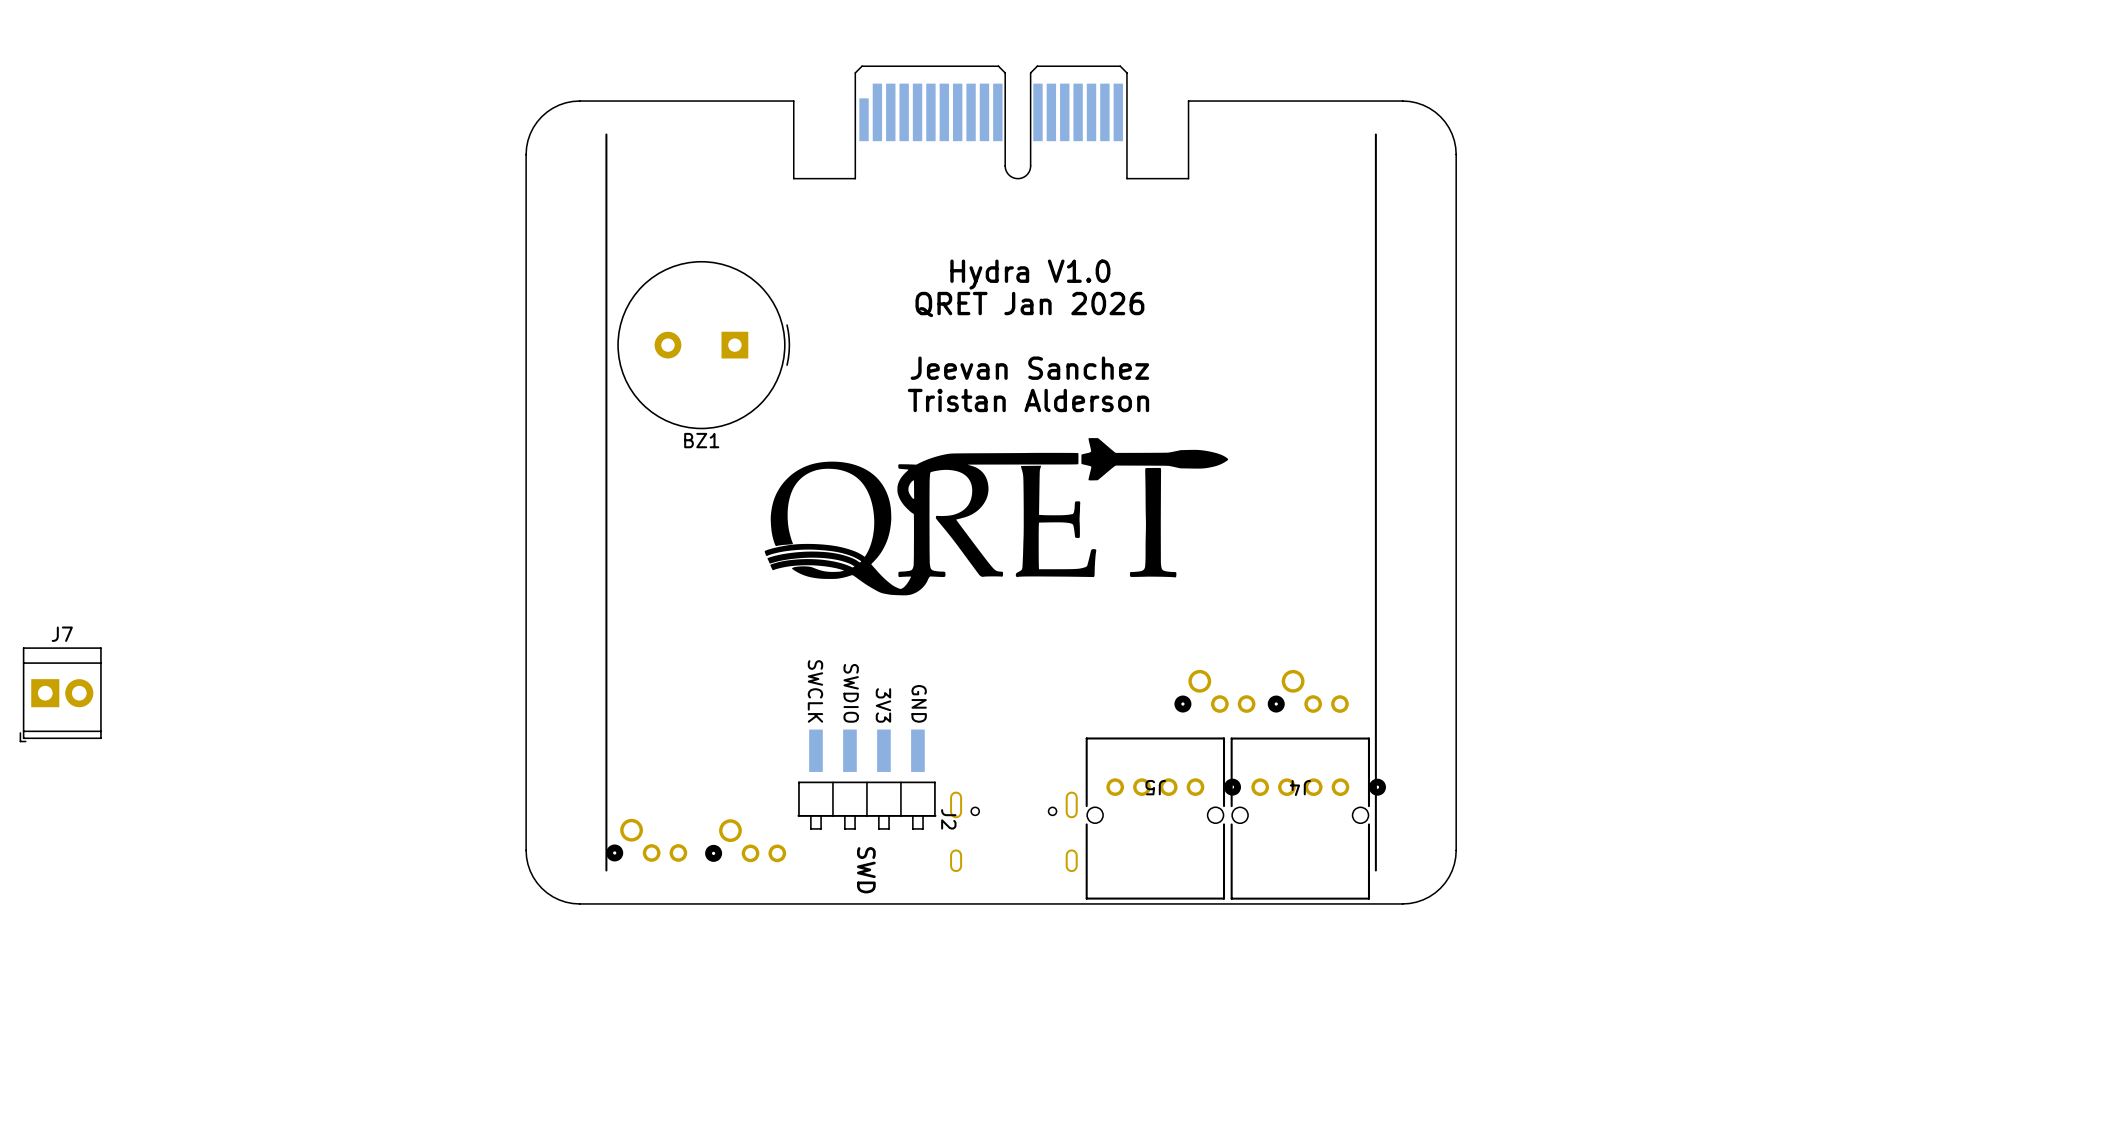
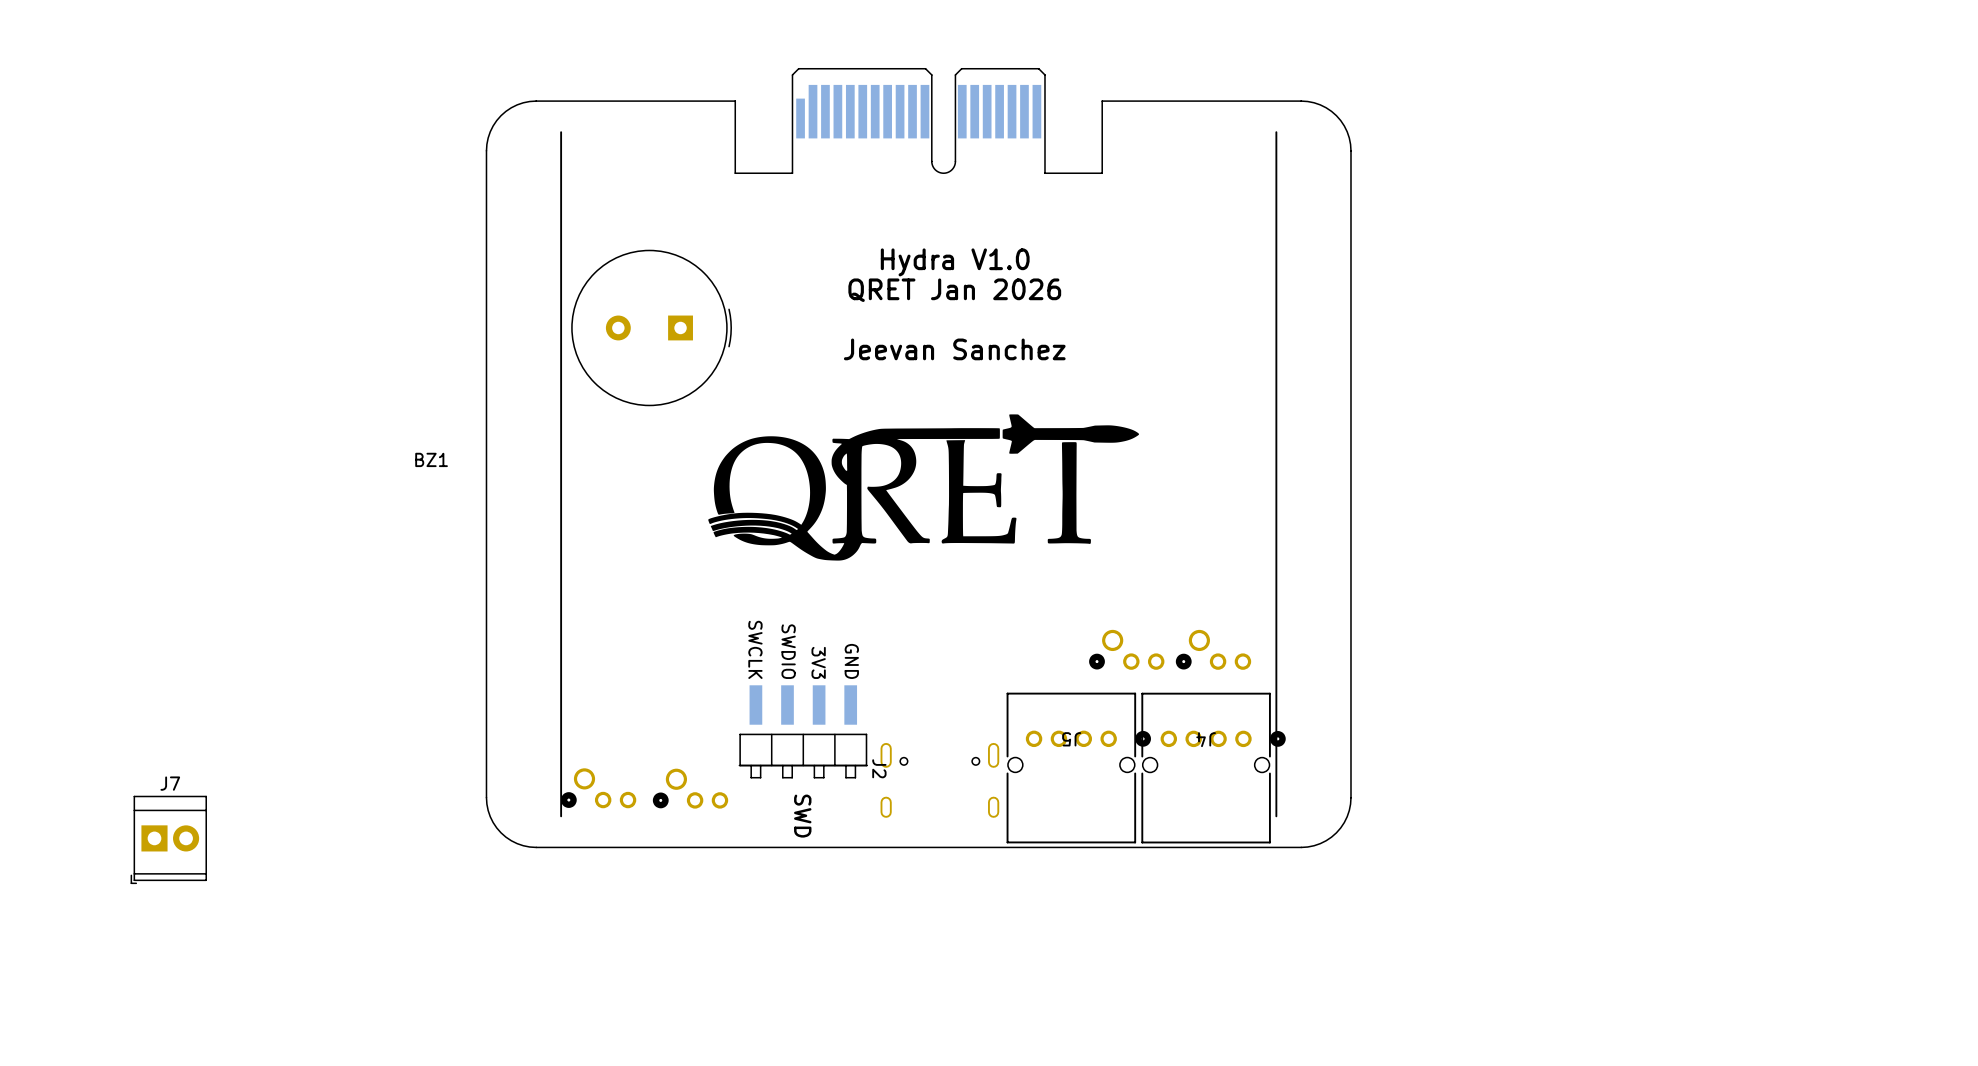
text: Tristan Alderson (1028, 400) -> none
BZ1 name position: BZ1 (701, 440) -> BZ1 (431, 459)
J7 position: (60, 694) -> (168, 839)

